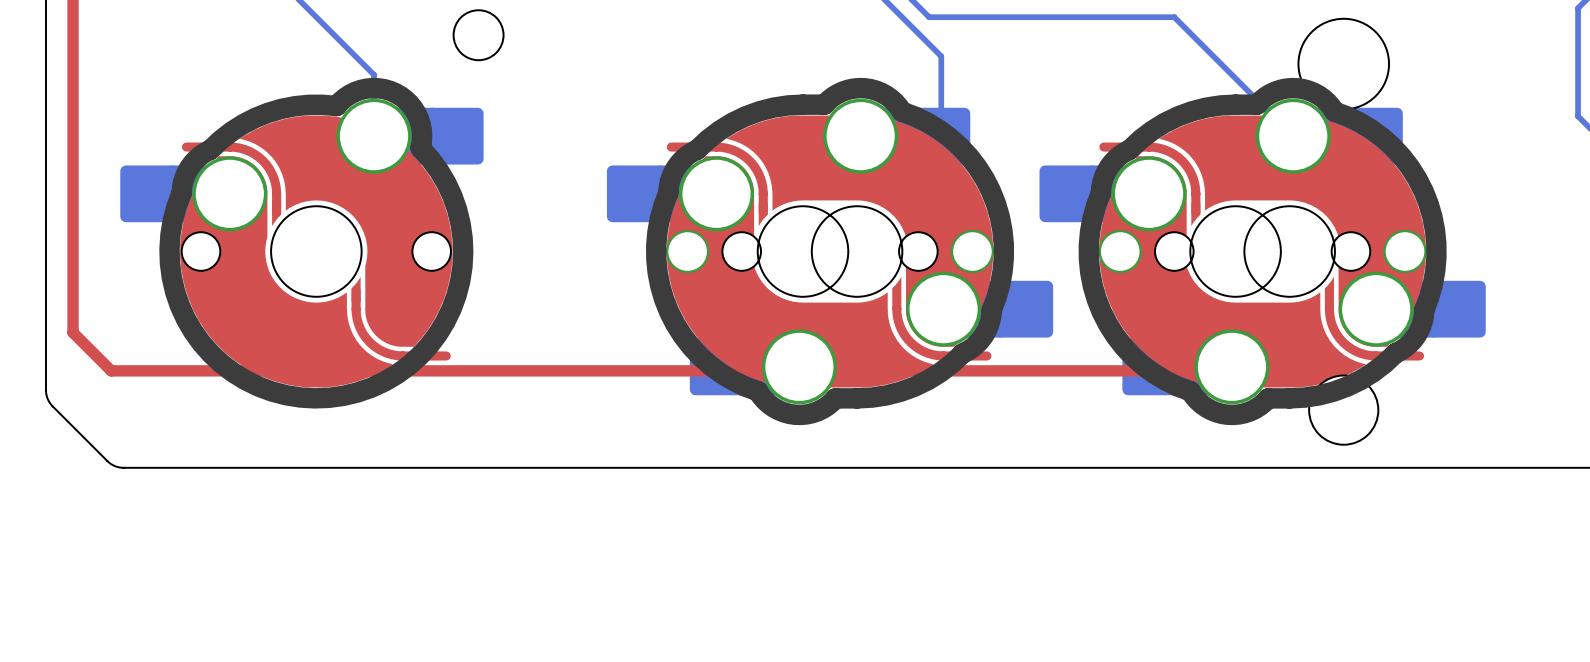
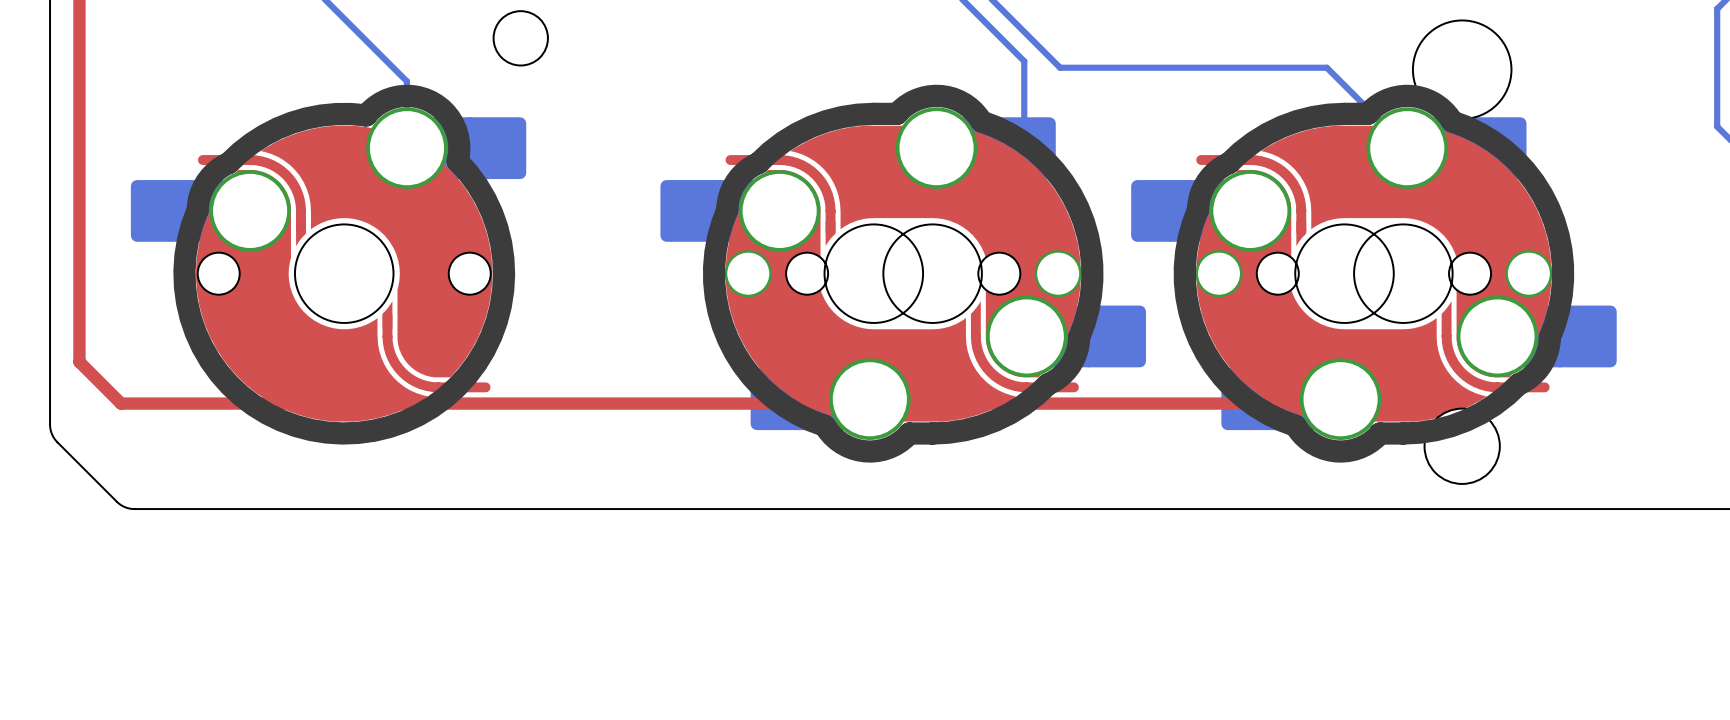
bottom track: (929, 17) (1174, 17) (1219, 62) -> (1011, 18) (1060, 67) (1326, 67)

